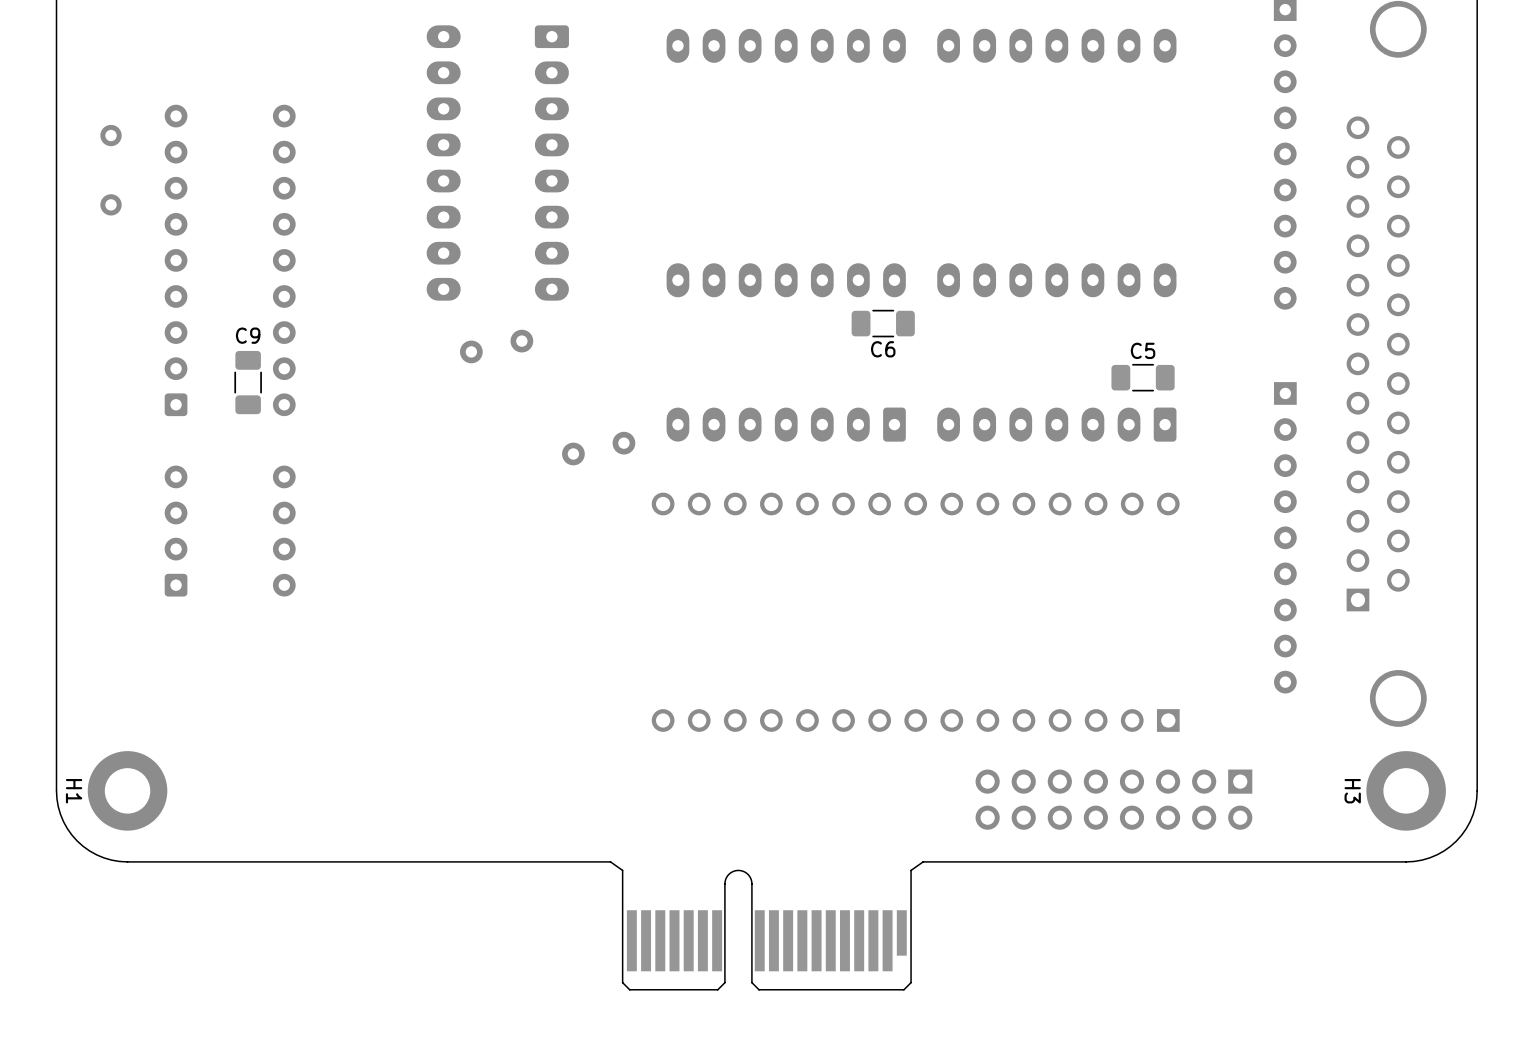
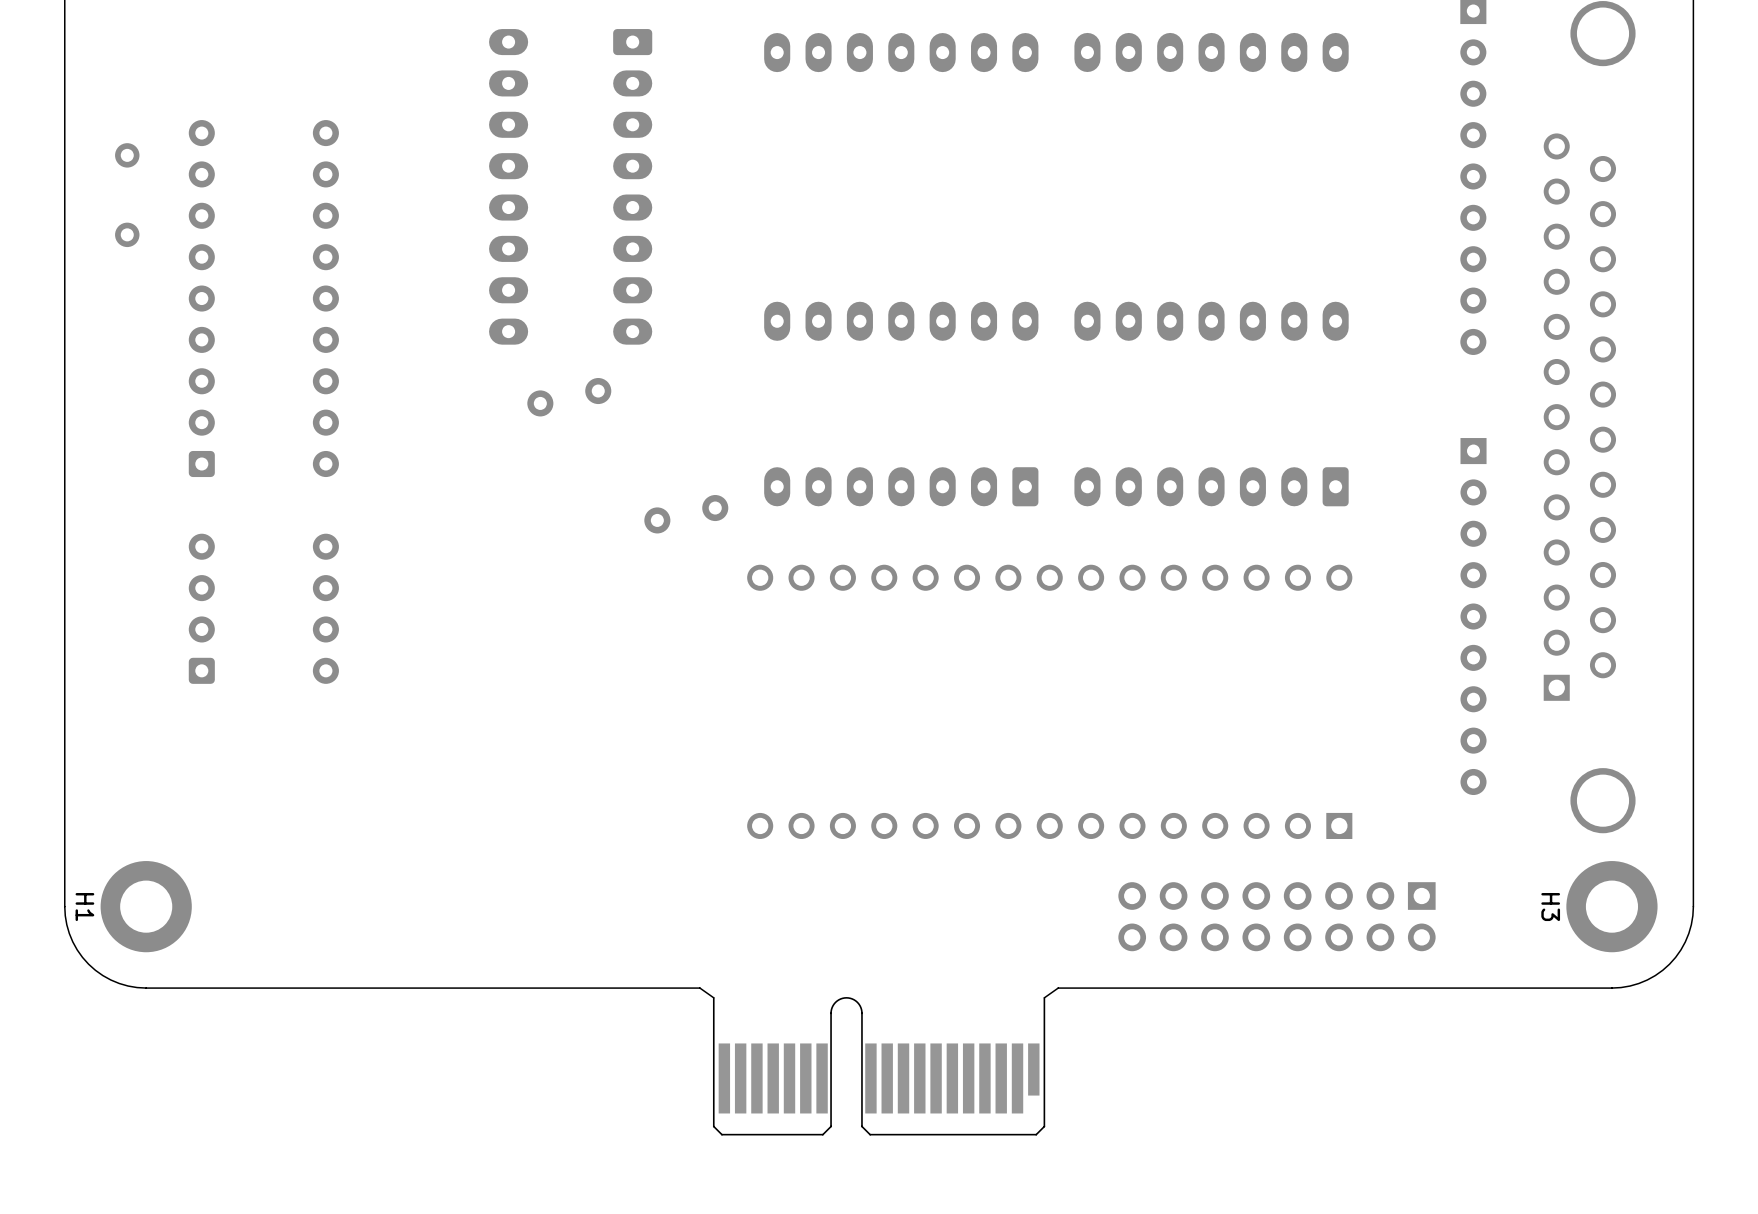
C6: (883, 323) -> none
C5: (1143, 377) -> none
C9: (248, 382) -> none

